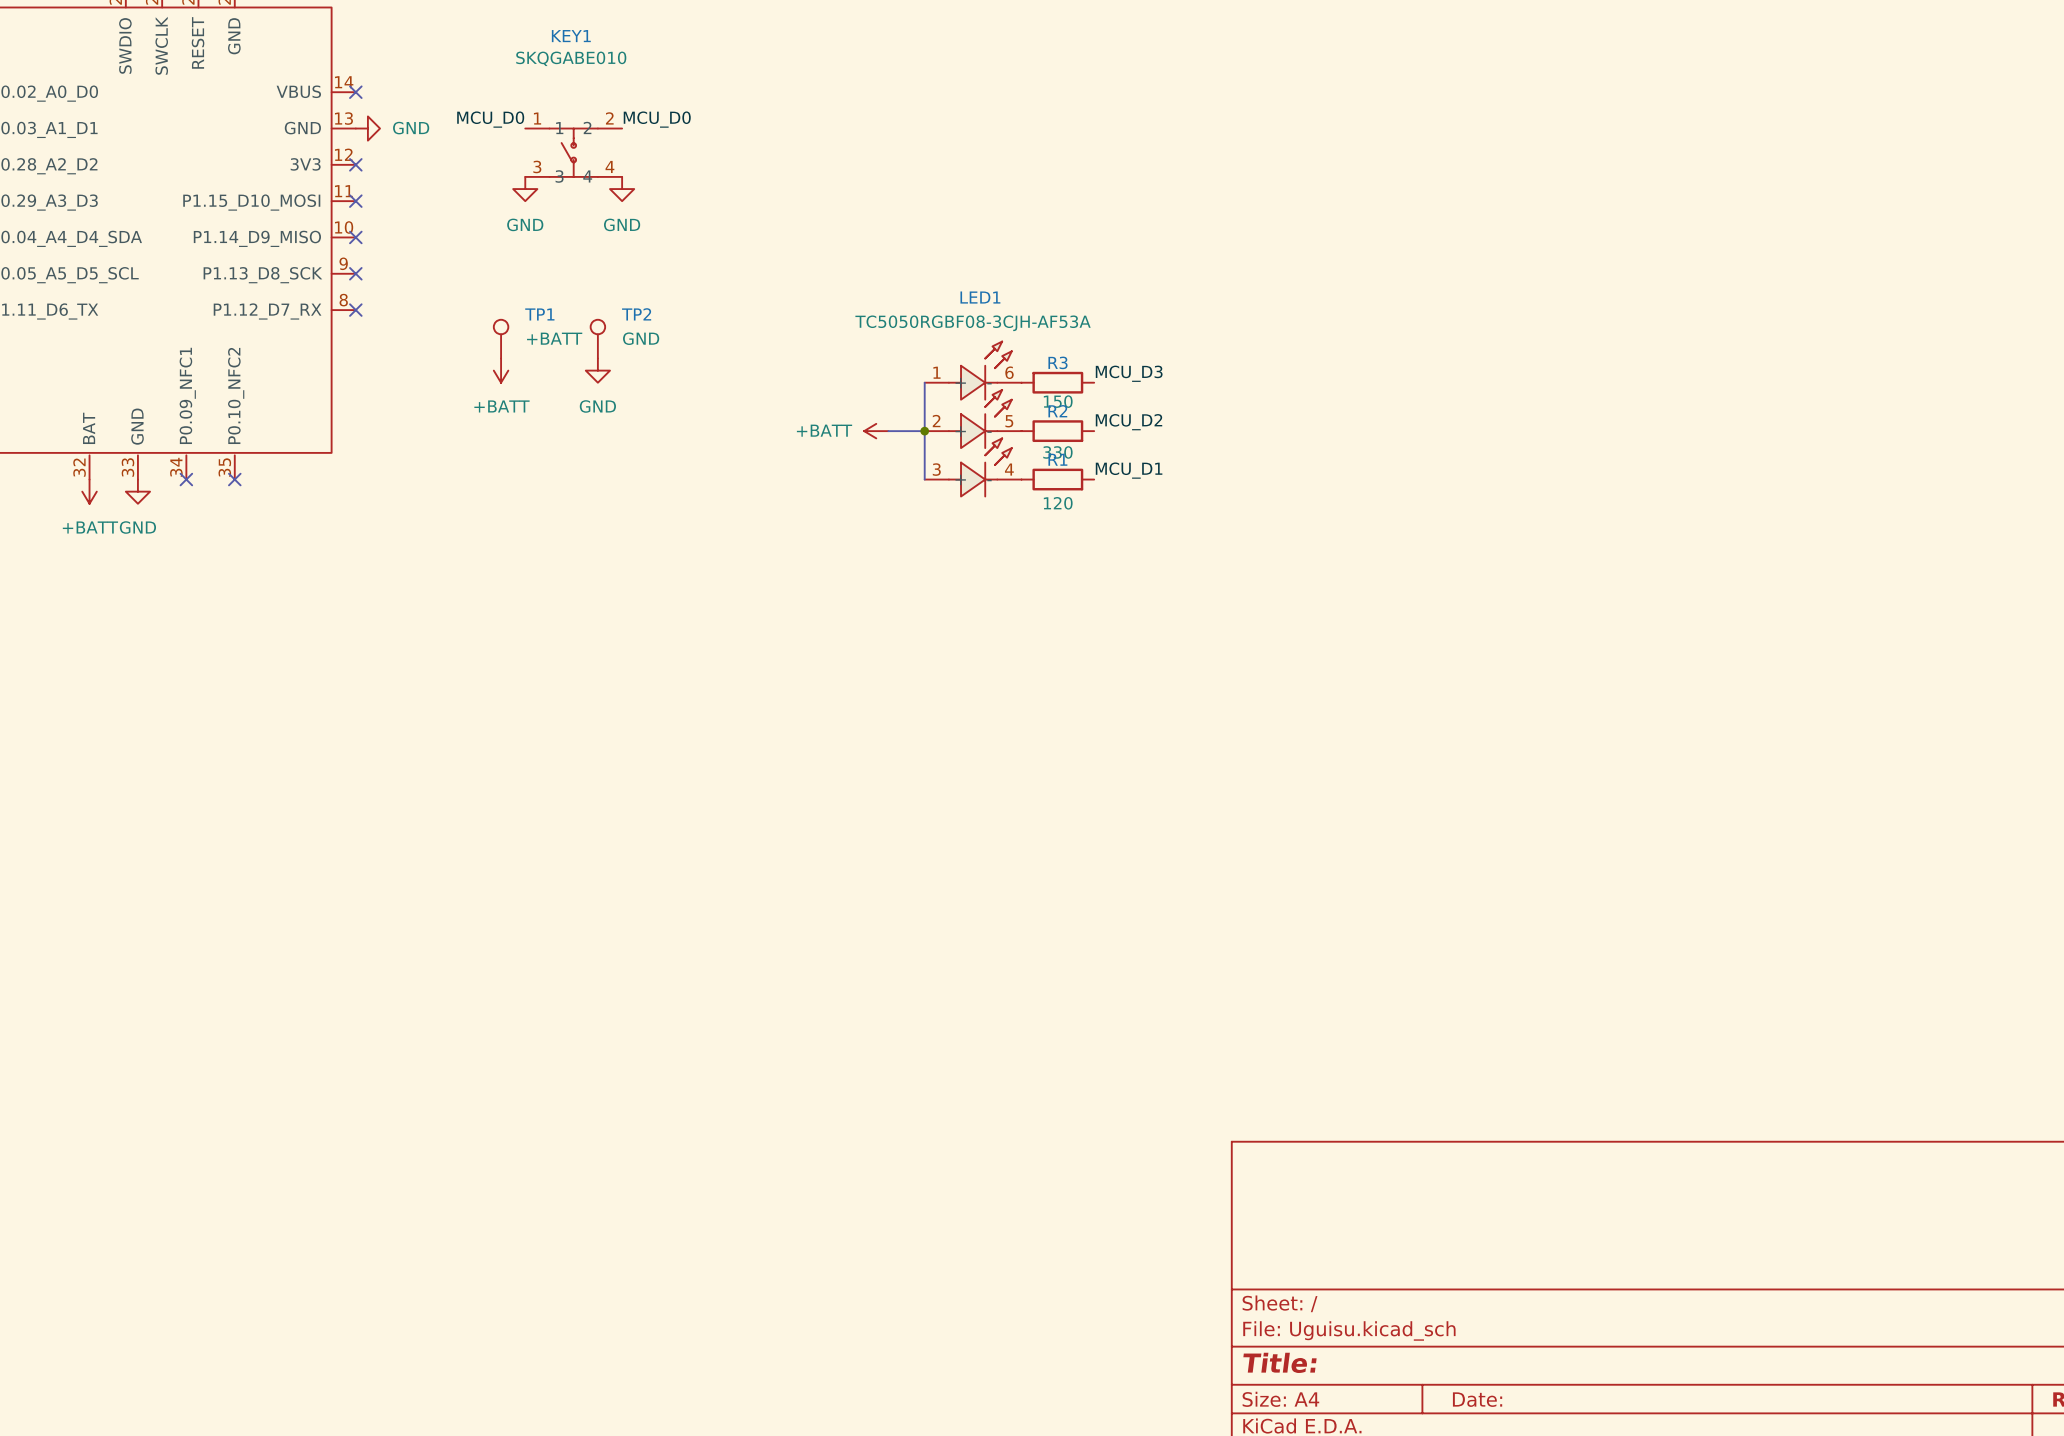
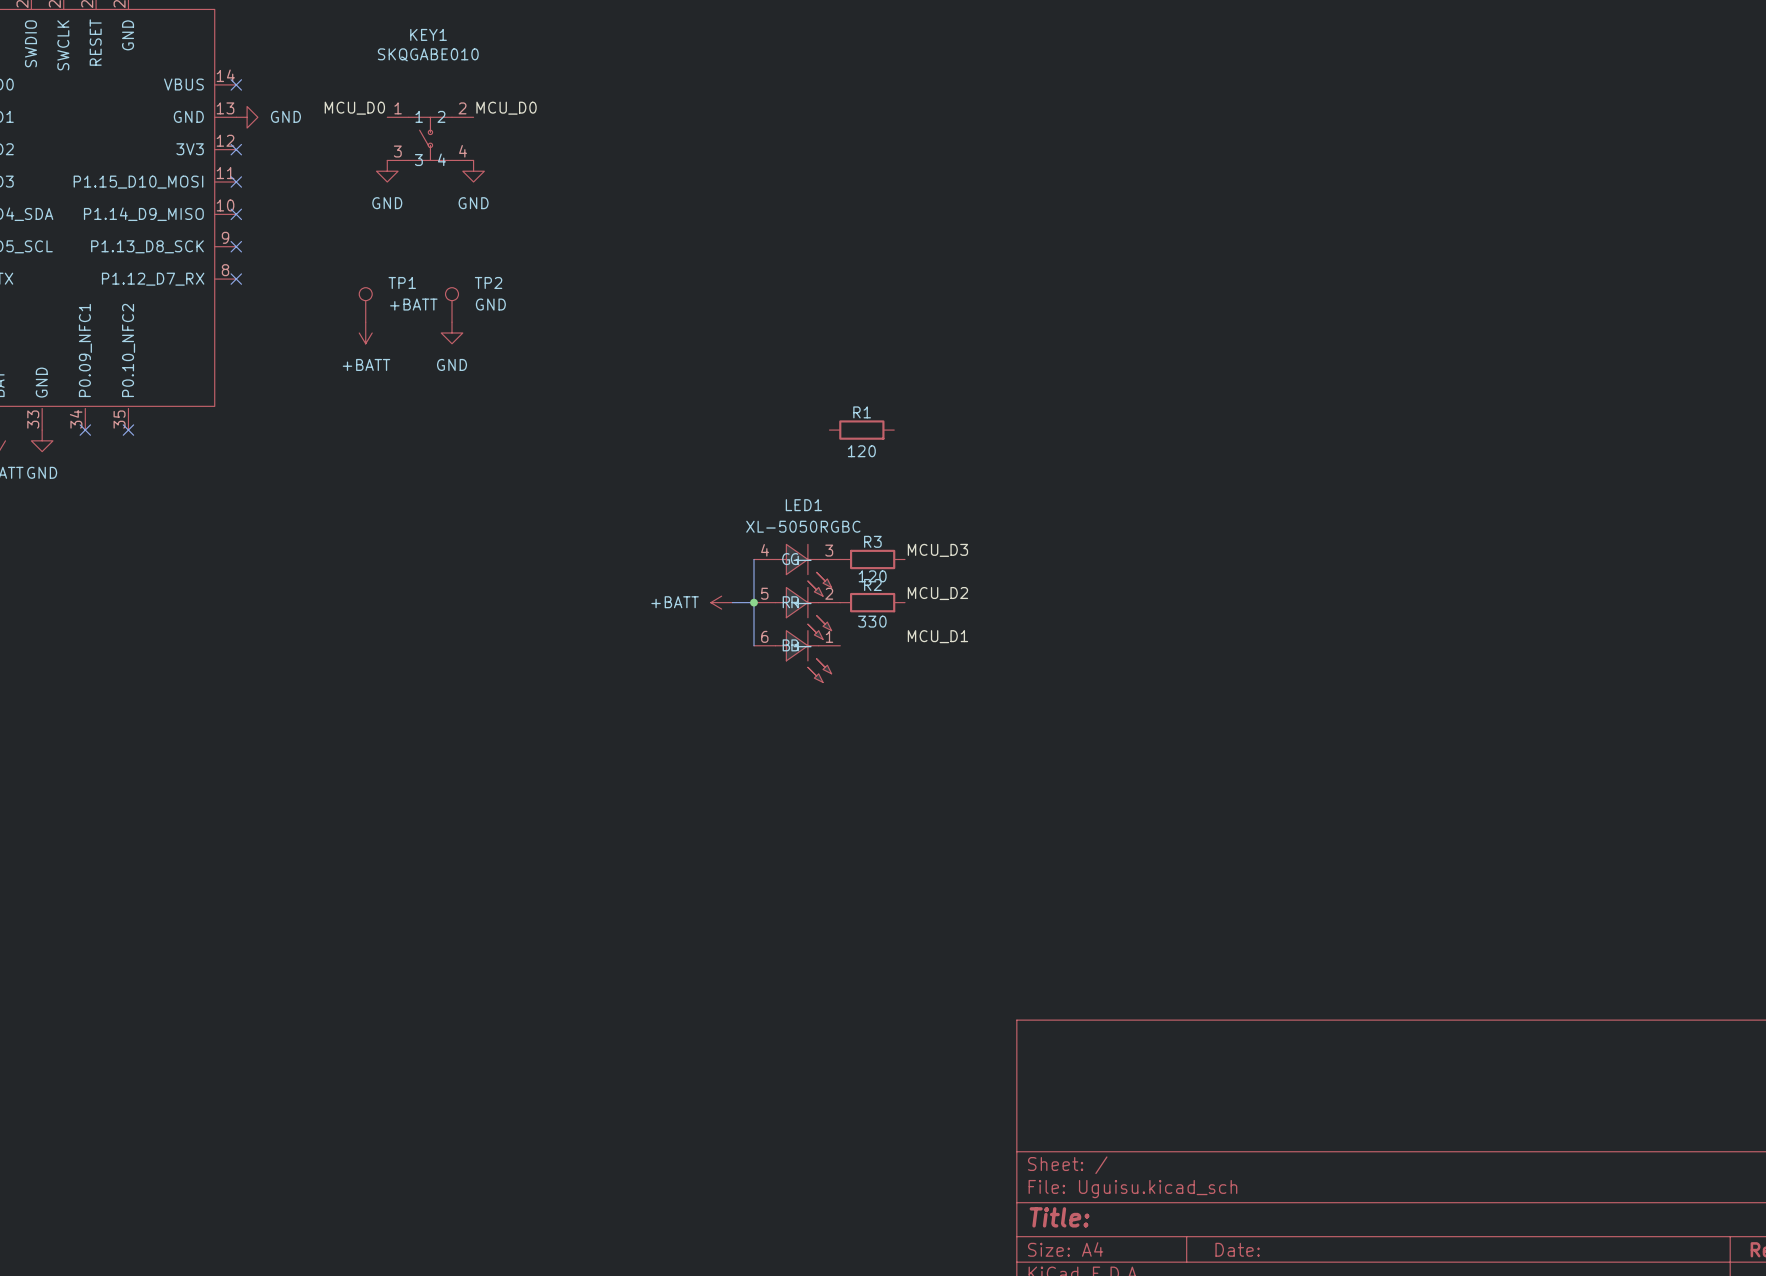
LED1 value: TC5050RGBF08-3CJH-AF53A (973, 323) -> XL-5050RGBC (803, 526)
LED1 symbol: [924, 341, 1022, 497] -> [753, 544, 841, 683]
label: MCU_D3 (1129, 373) -> none
bus: (924, 382) (924, 479) -> none
R3 position: (1057, 382) -> (872, 559)
R3 value: 150 (1058, 401) -> 120 (872, 576)
label: MCU_D2 (1129, 422) -> none
power symbol: +BATT (876, 431) -> none
bus: (888, 431) (924, 431) -> none
junction: (924, 431) -> none
R2 position: (1057, 431) -> (872, 602)
label: MCU_D1 (1129, 470) -> none
label: none -> MCU_D3 (937, 550)
bus: none -> (753, 559) (753, 645)
label: none -> MCU_D2 (937, 593)
power symbol: none -> +BATT (721, 602)
bus: none -> (732, 602) (753, 602)
junction: none -> (753, 602)
label: none -> MCU_D1 (937, 636)

